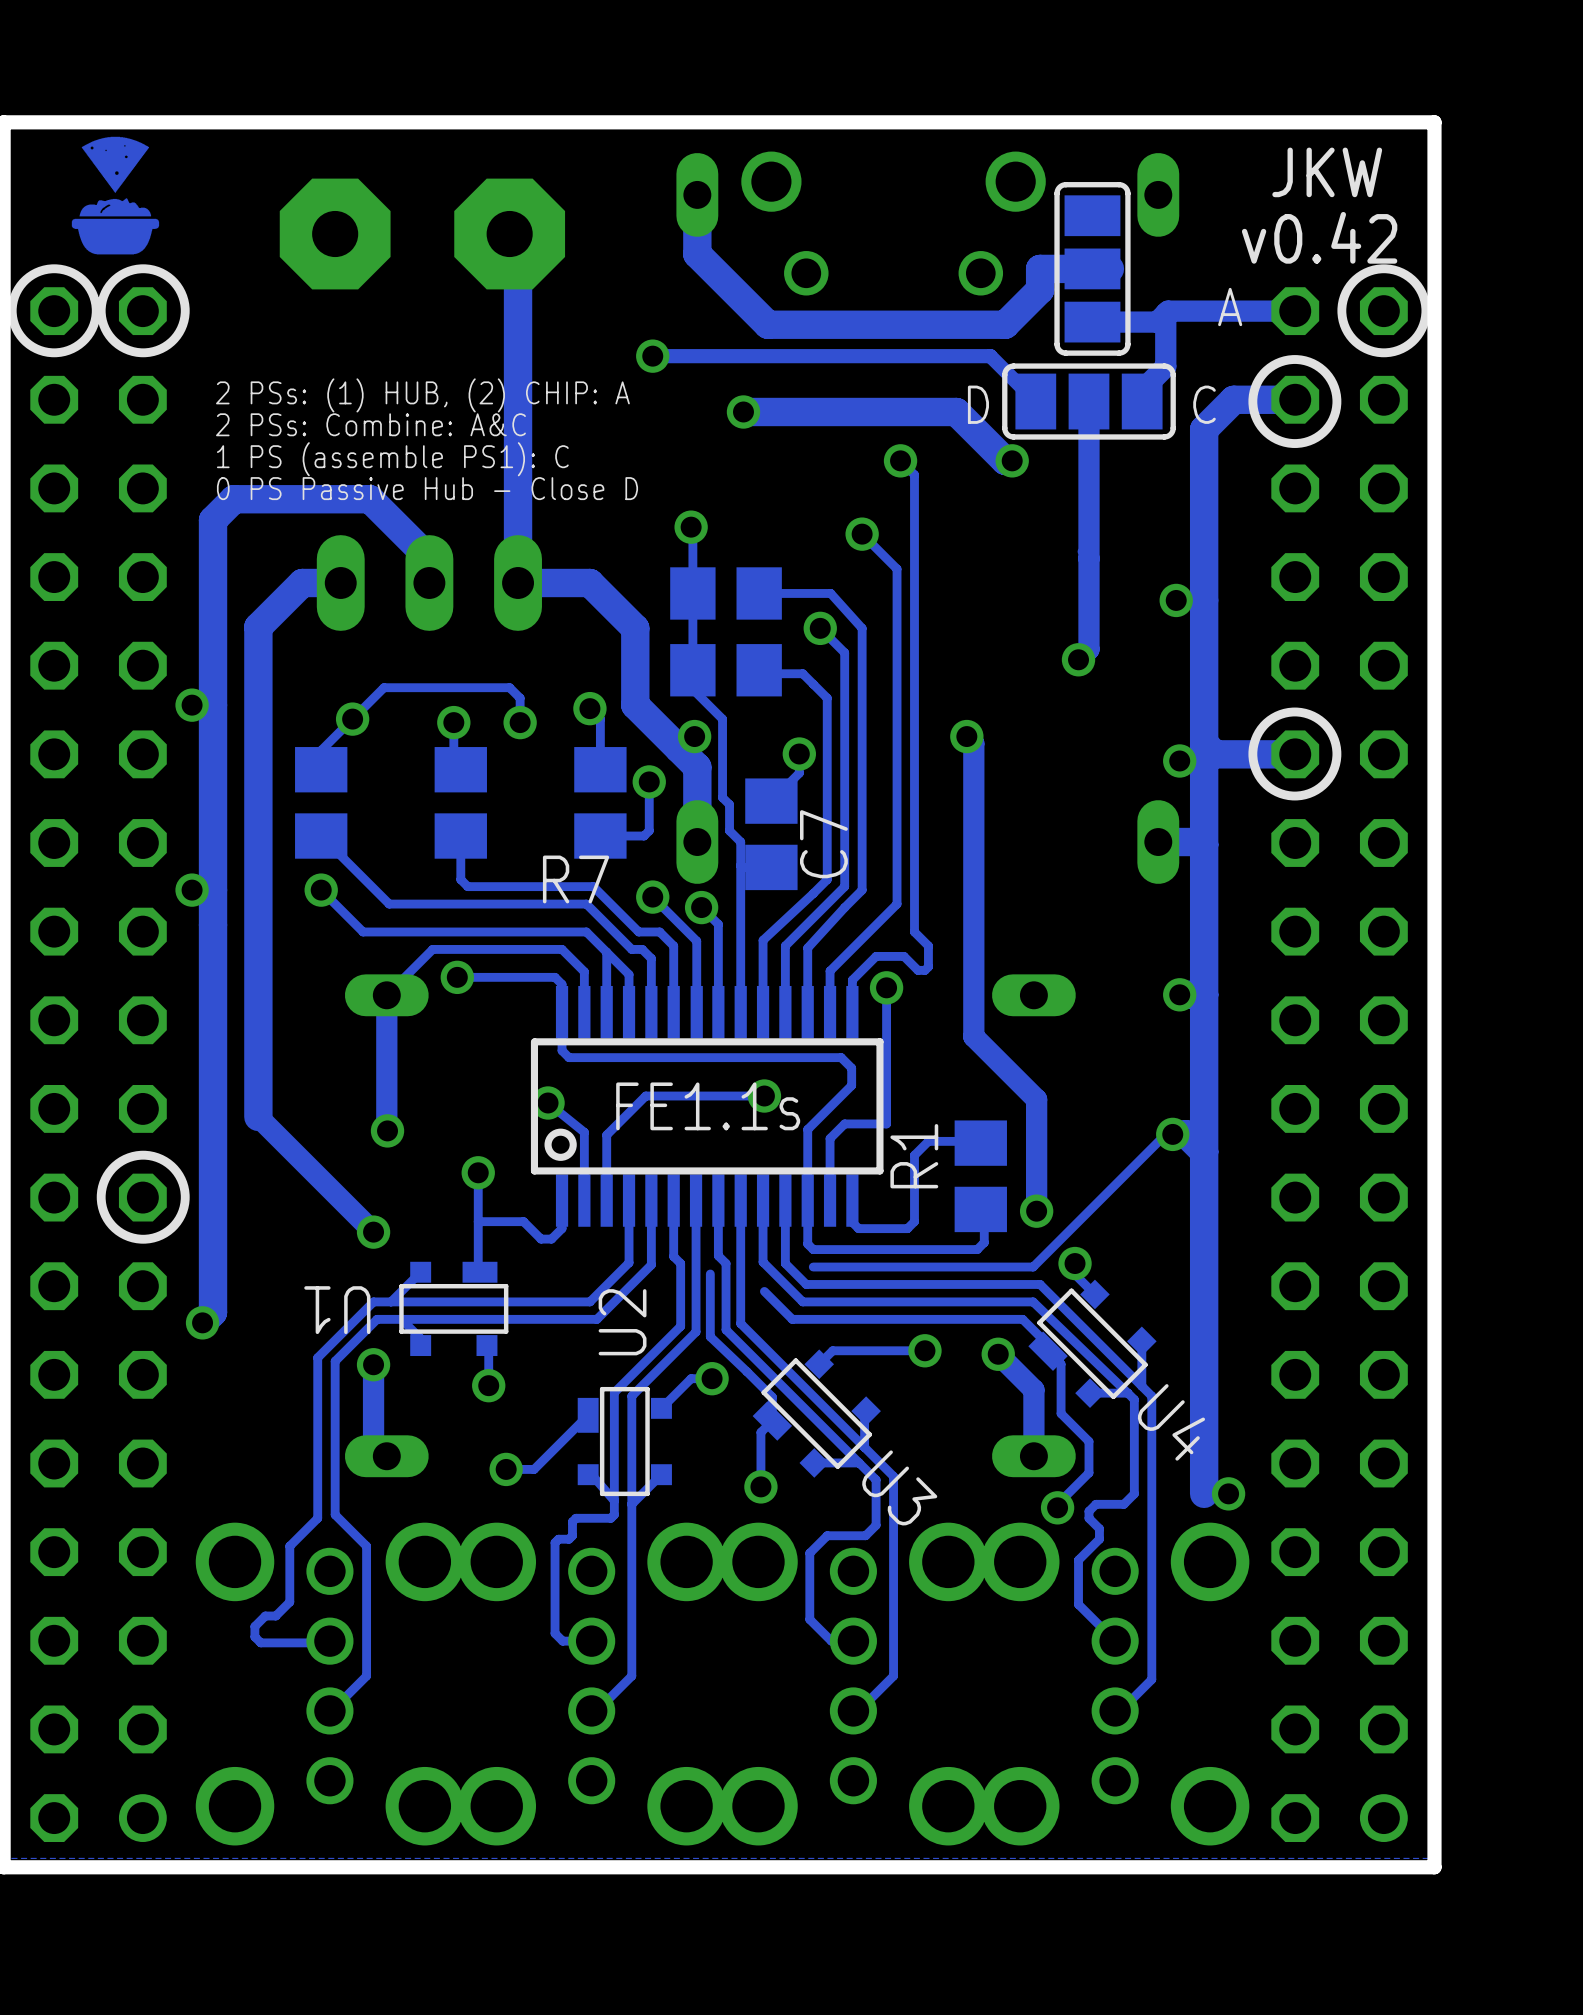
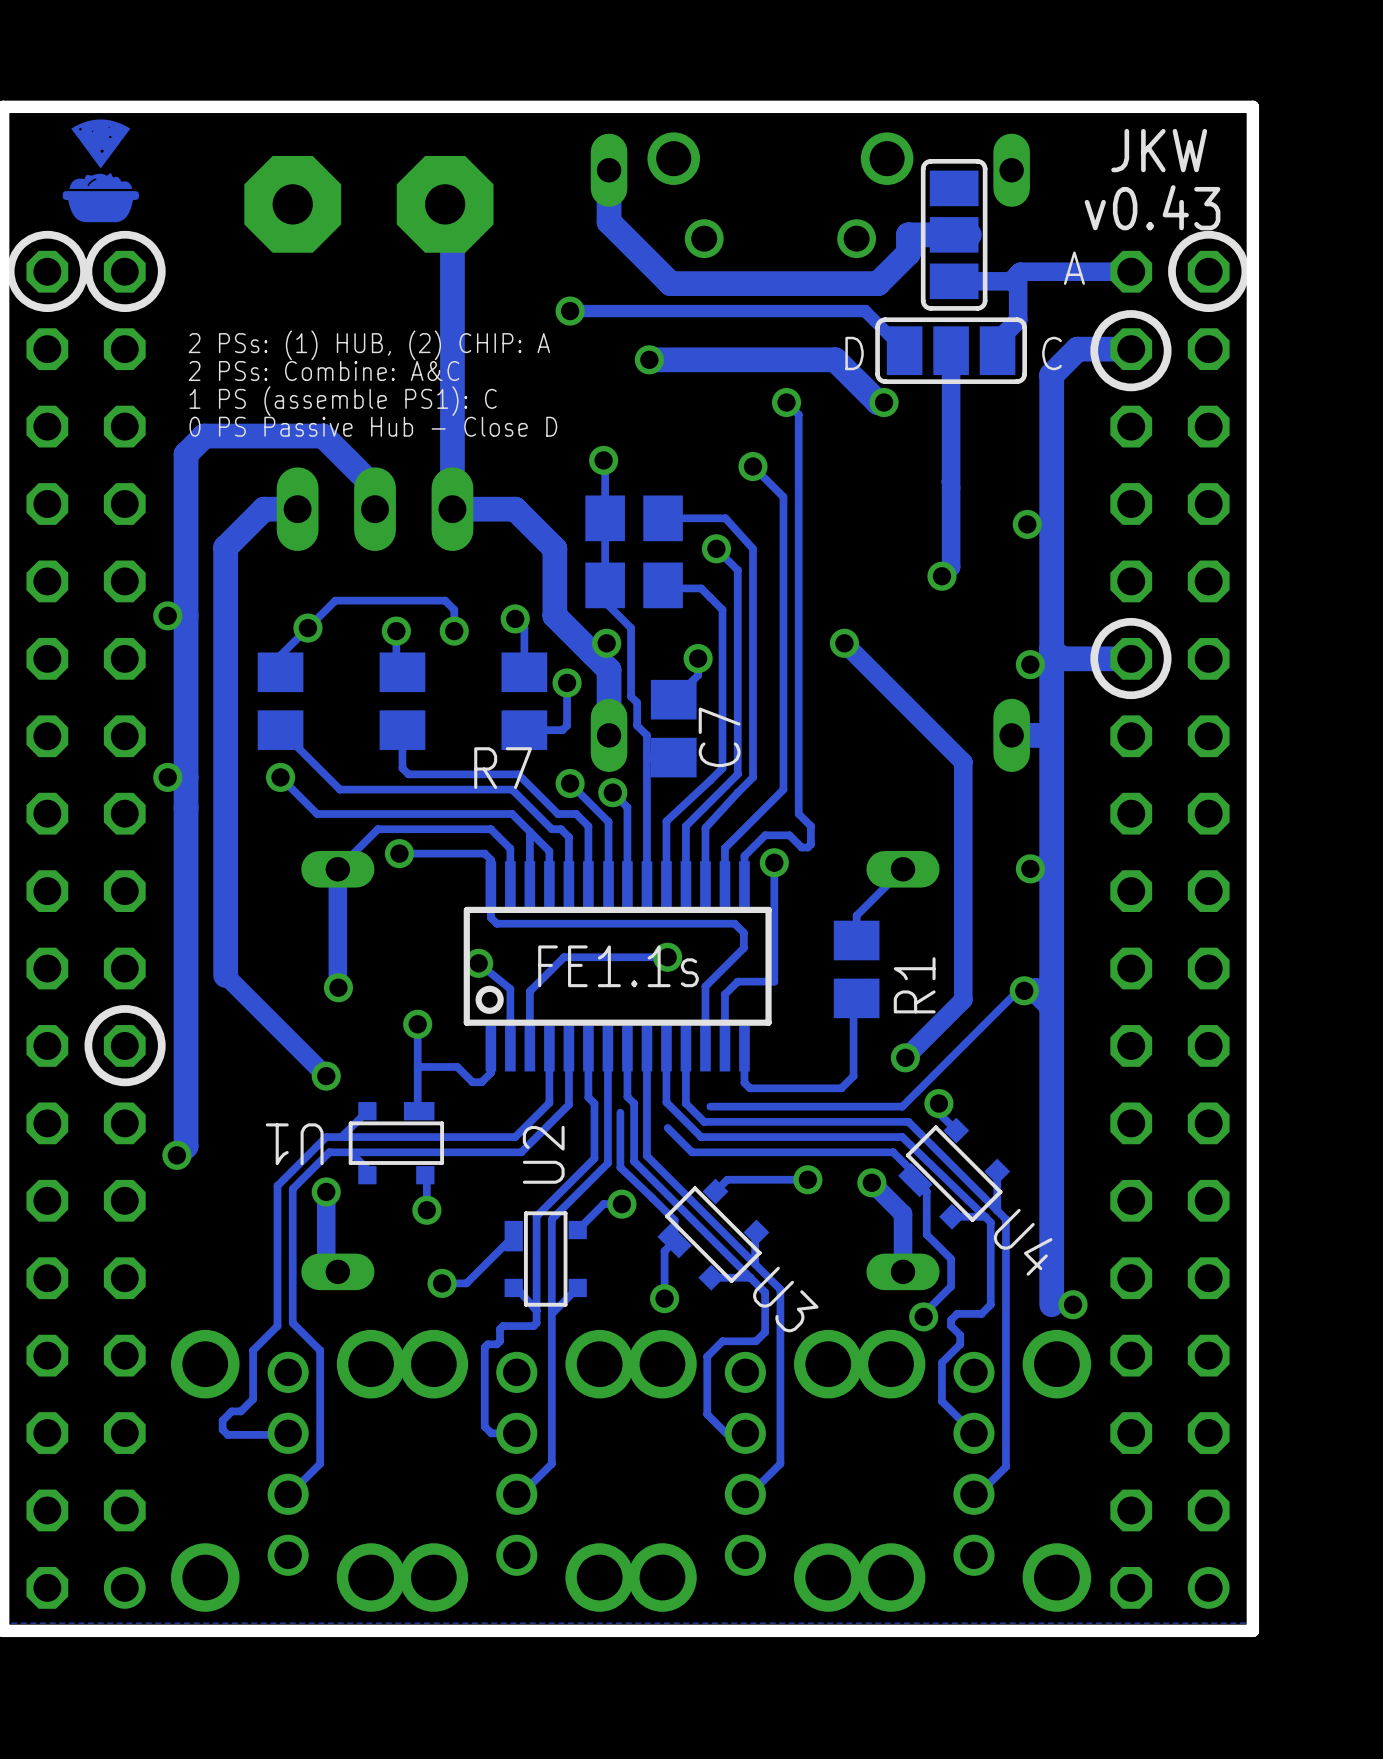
text: v0.42 (1319, 237) -> v0.43 (1152, 207)
track: (973, 743) (973, 1036) (1036, 1099) (1036, 1211) -> (850, 649) (963, 762) (963, 999) (905, 1057)
track: none -> (903, 869) (856, 915) (856, 940)
track: (980, 1143) (979, 1141) (928, 1141) (914, 1155) (914, 1221) (907, 1228) (858, 1228) (852, 1222) -> (856, 998) (853, 1001) (853, 1076) (841, 1088) (749, 1088) (744, 1082) (744, 1067)
R1 name position: R1 (914, 1156) -> R1 (914, 985)
R1 position: (980, 1176) -> (856, 969)
track: (807, 1200) (807, 1244) (813, 1249) (977, 1249) (984, 1242) (984, 1212) (980, 1209) -> none

